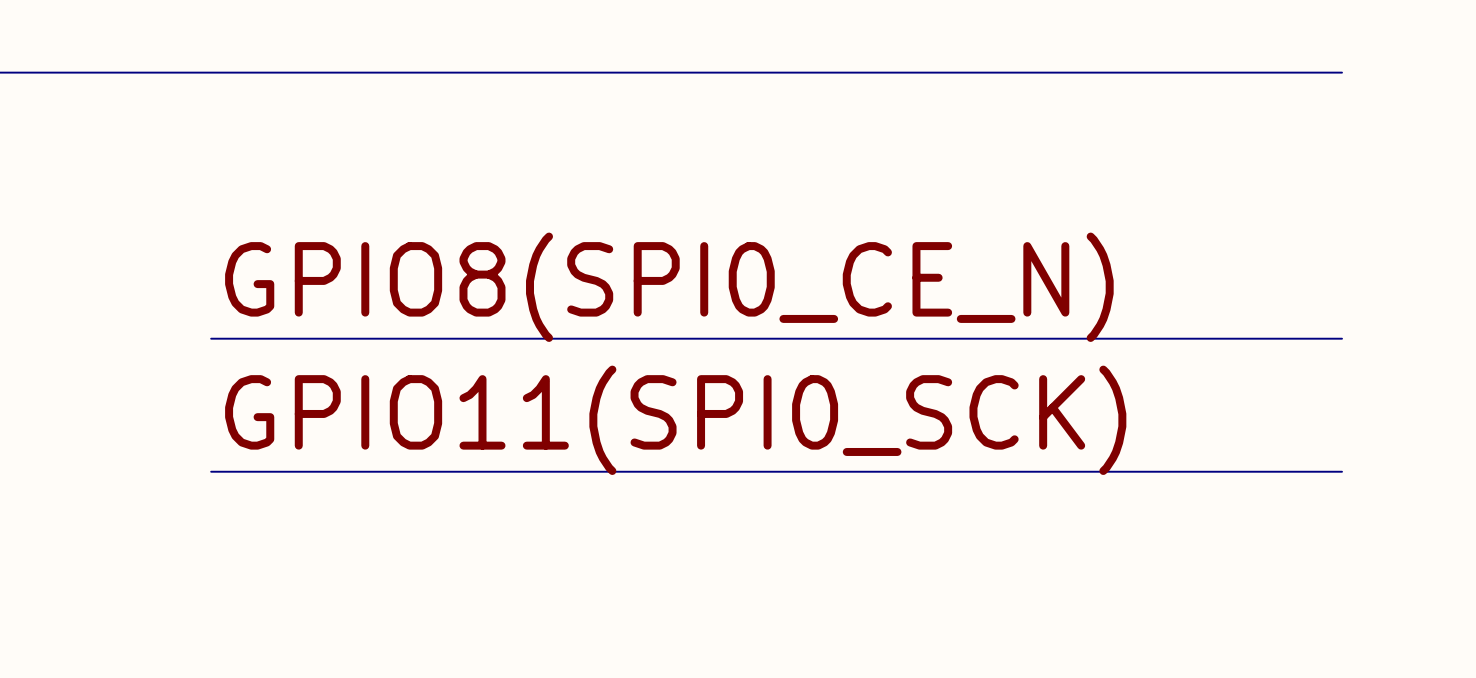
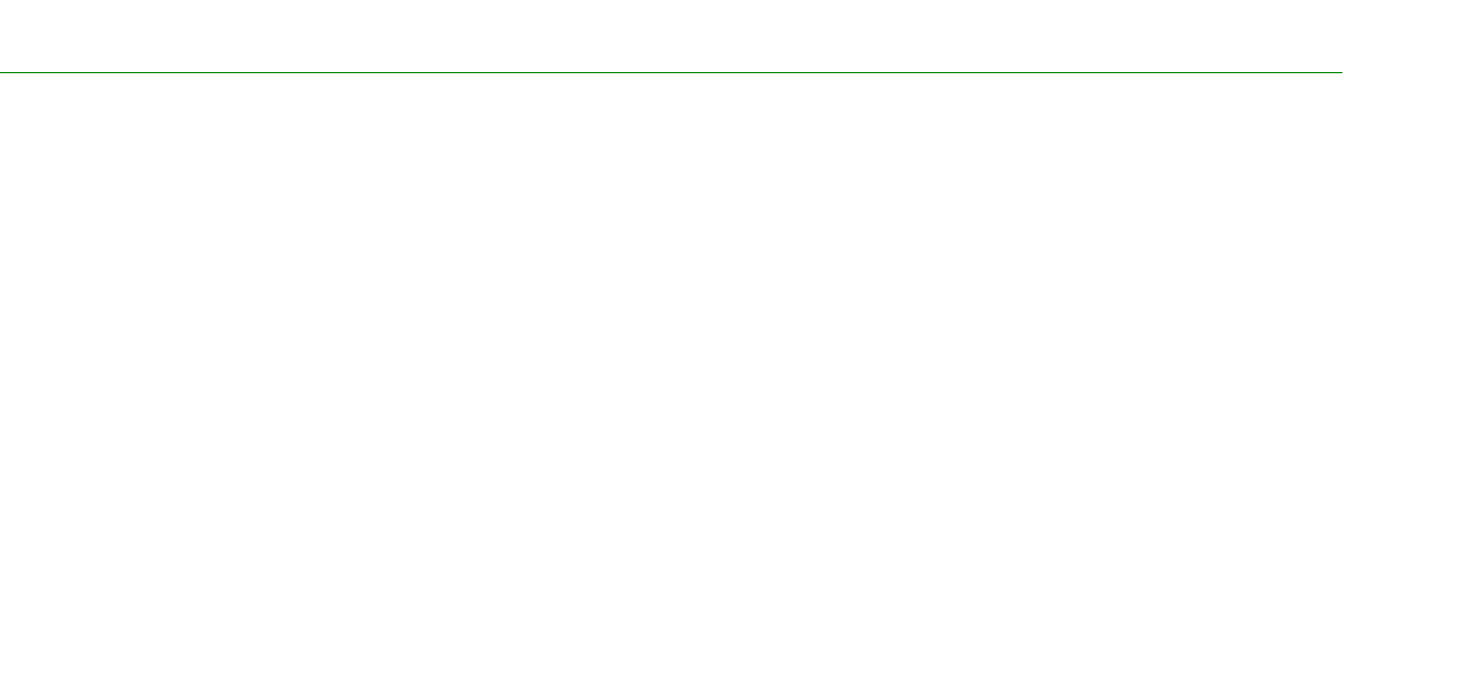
label: GPIO8(SPI0_CE_N) (669, 287) -> none
wire: (211, 338) (1342, 338) -> none
label: GPIO11(SPI0_SCK) (675, 420) -> none
wire: (211, 471) (1342, 471) -> none

